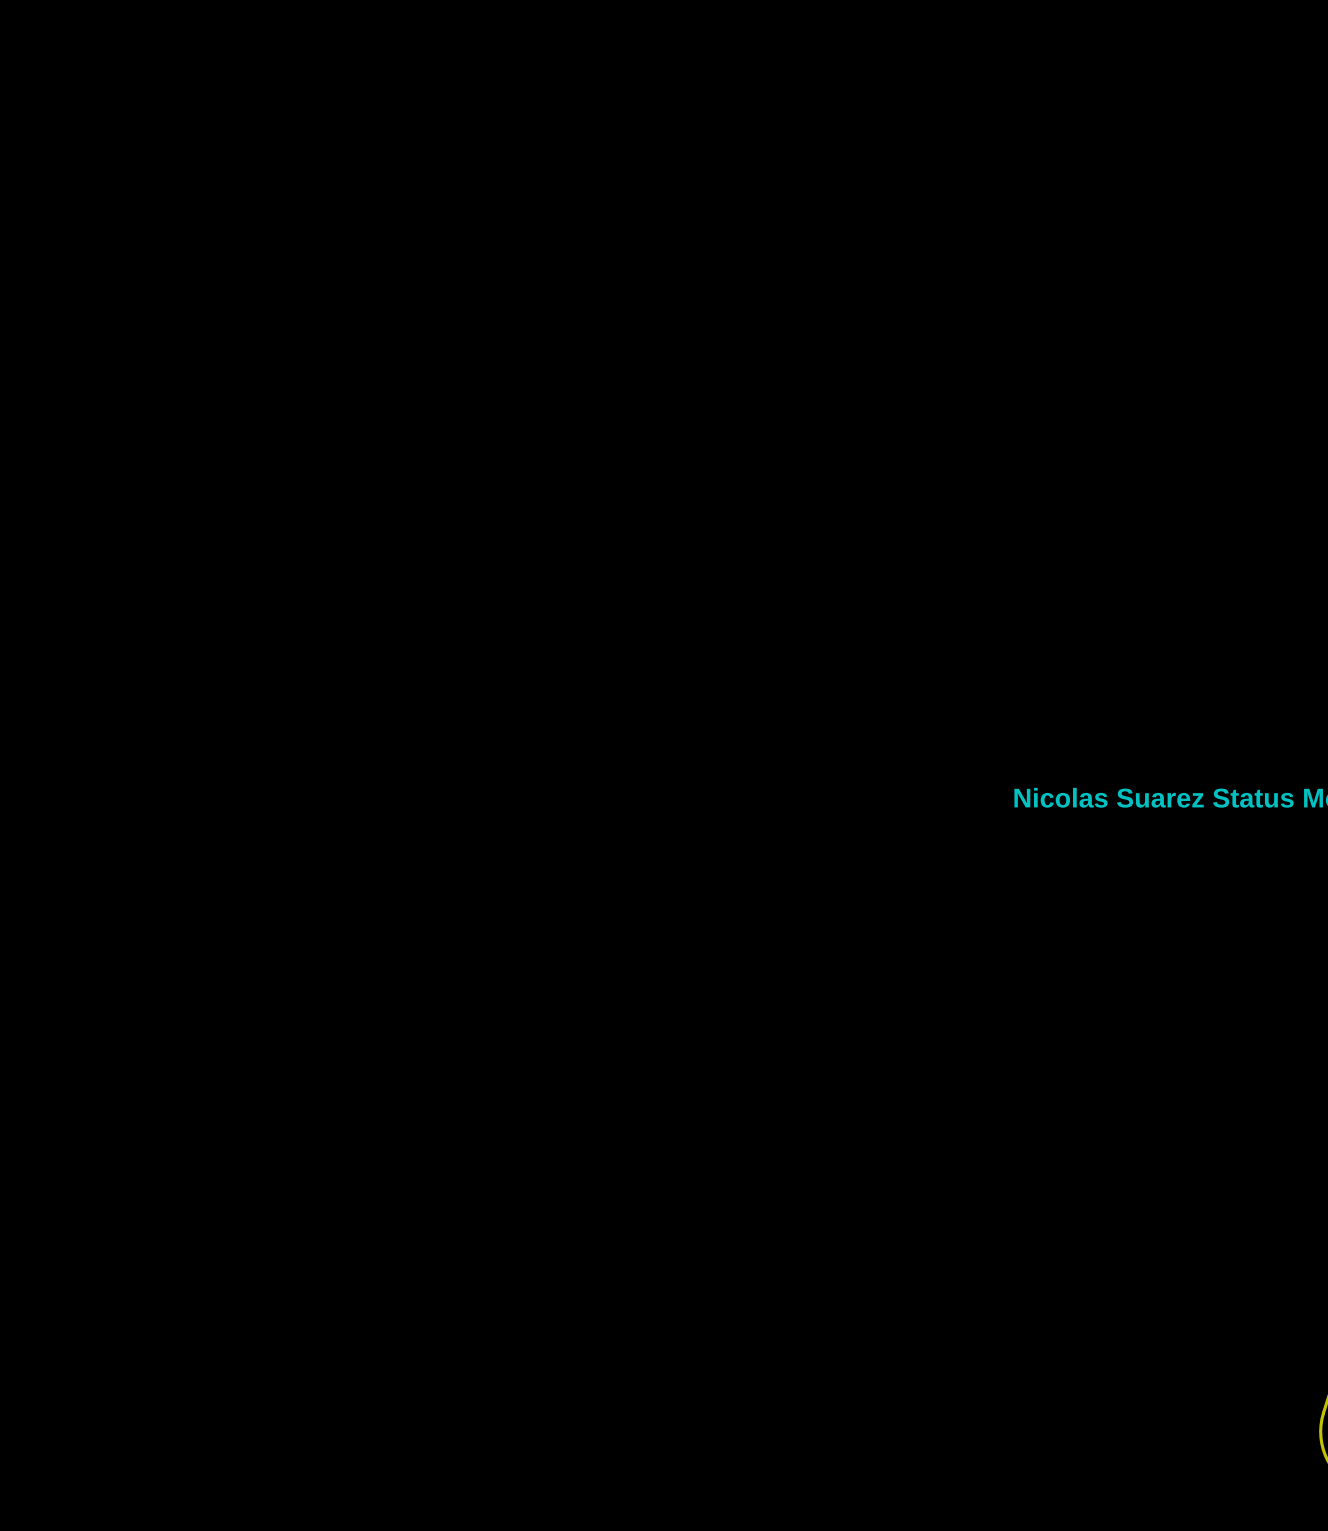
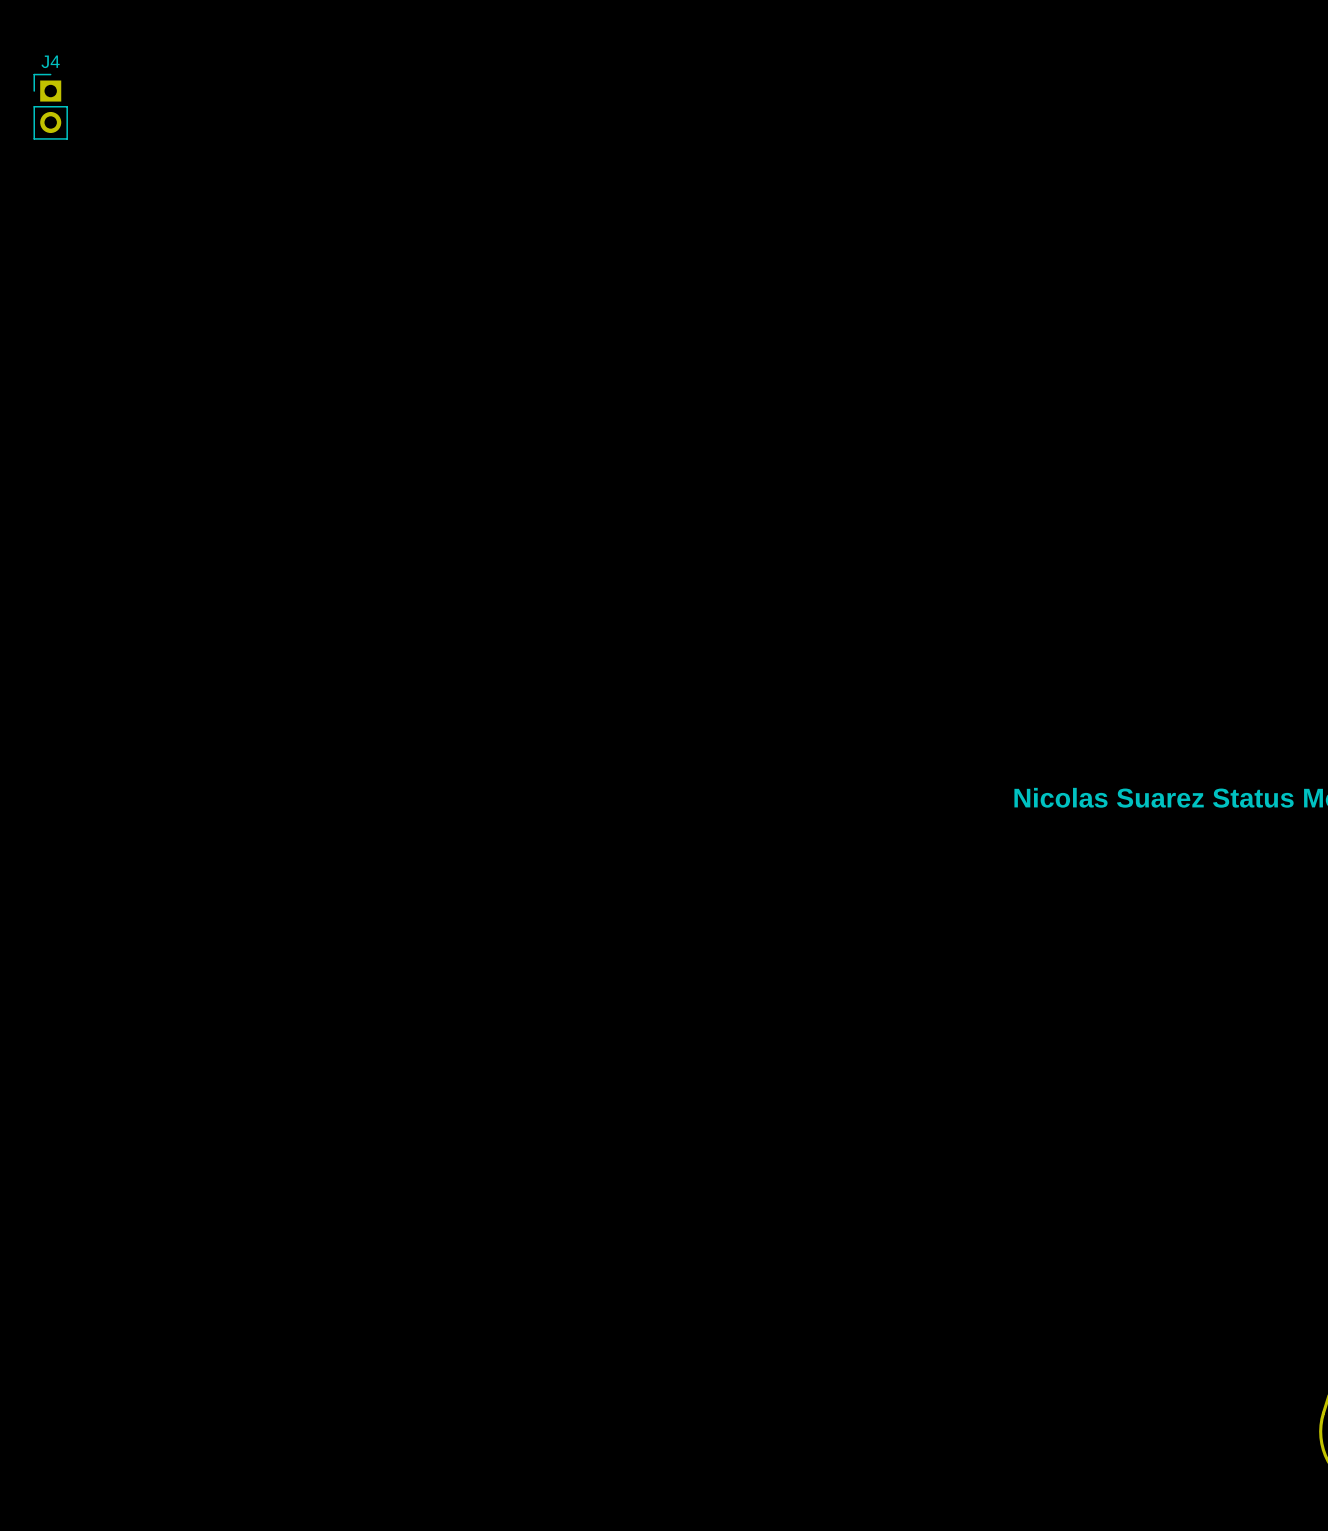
J4: none -> (50, 106)

